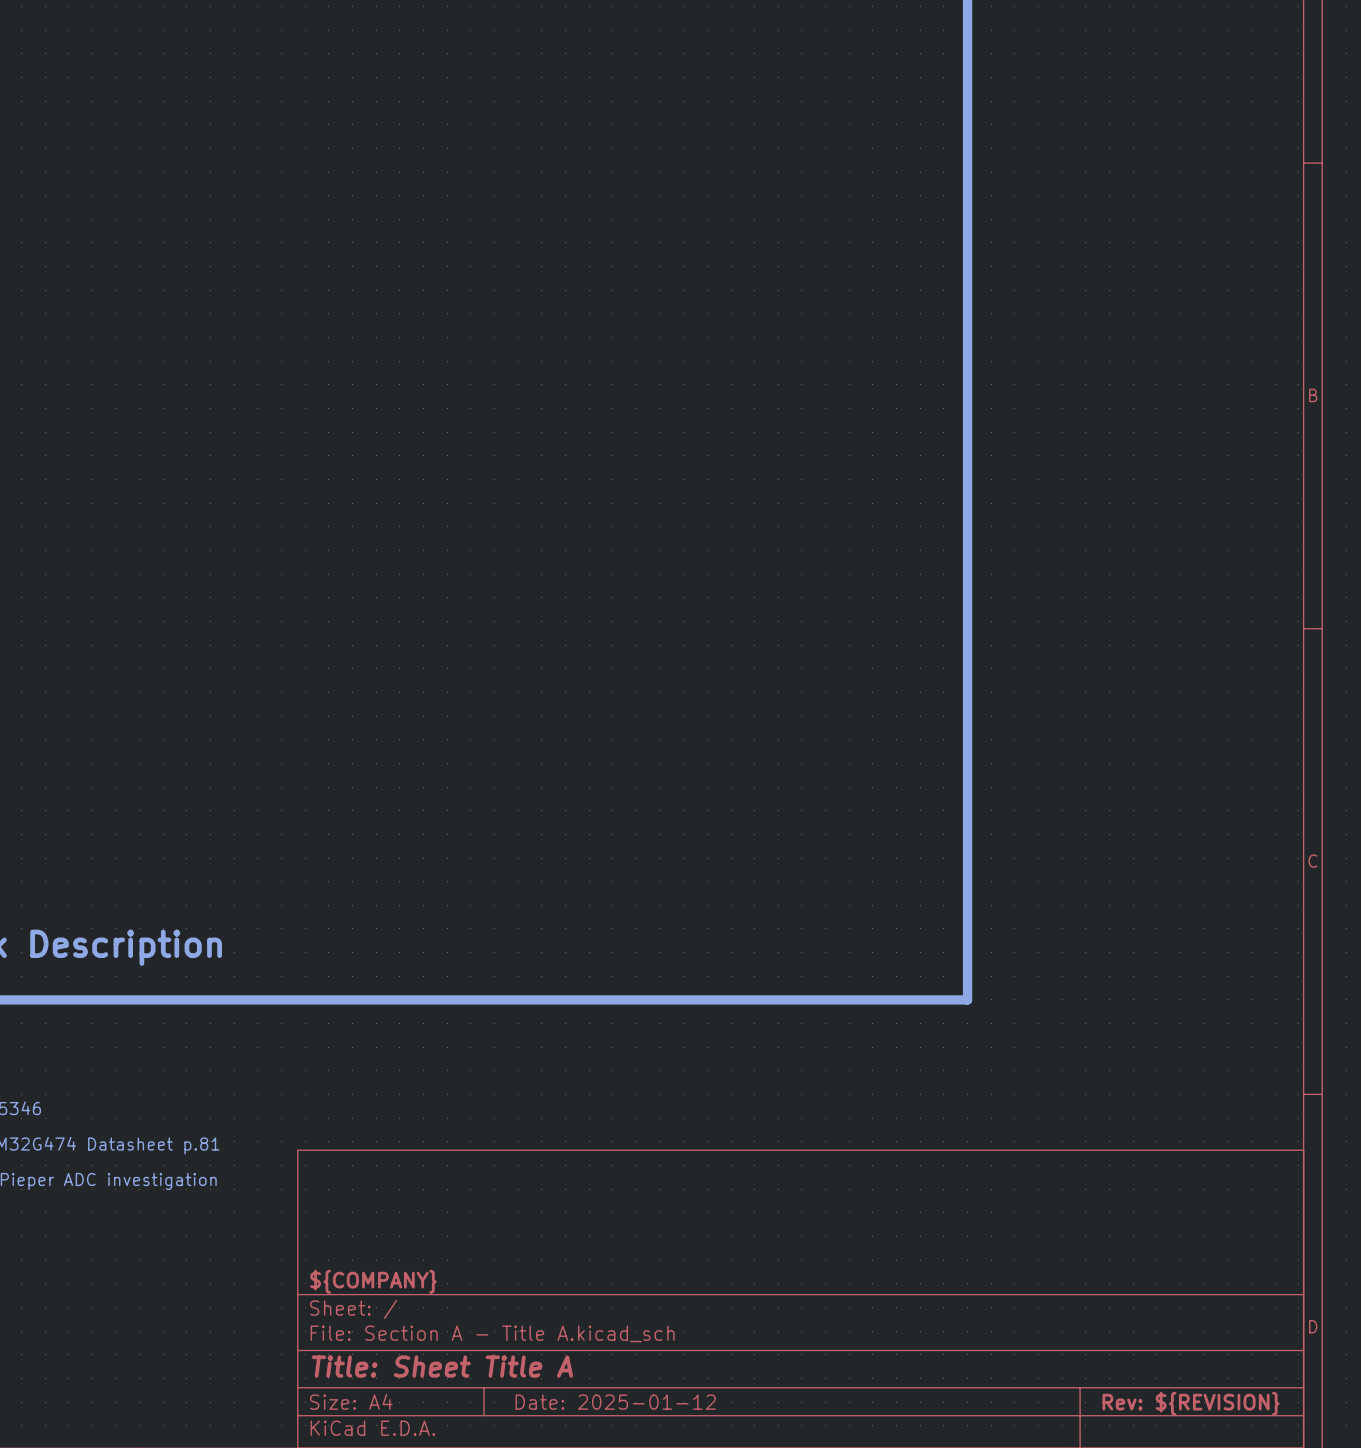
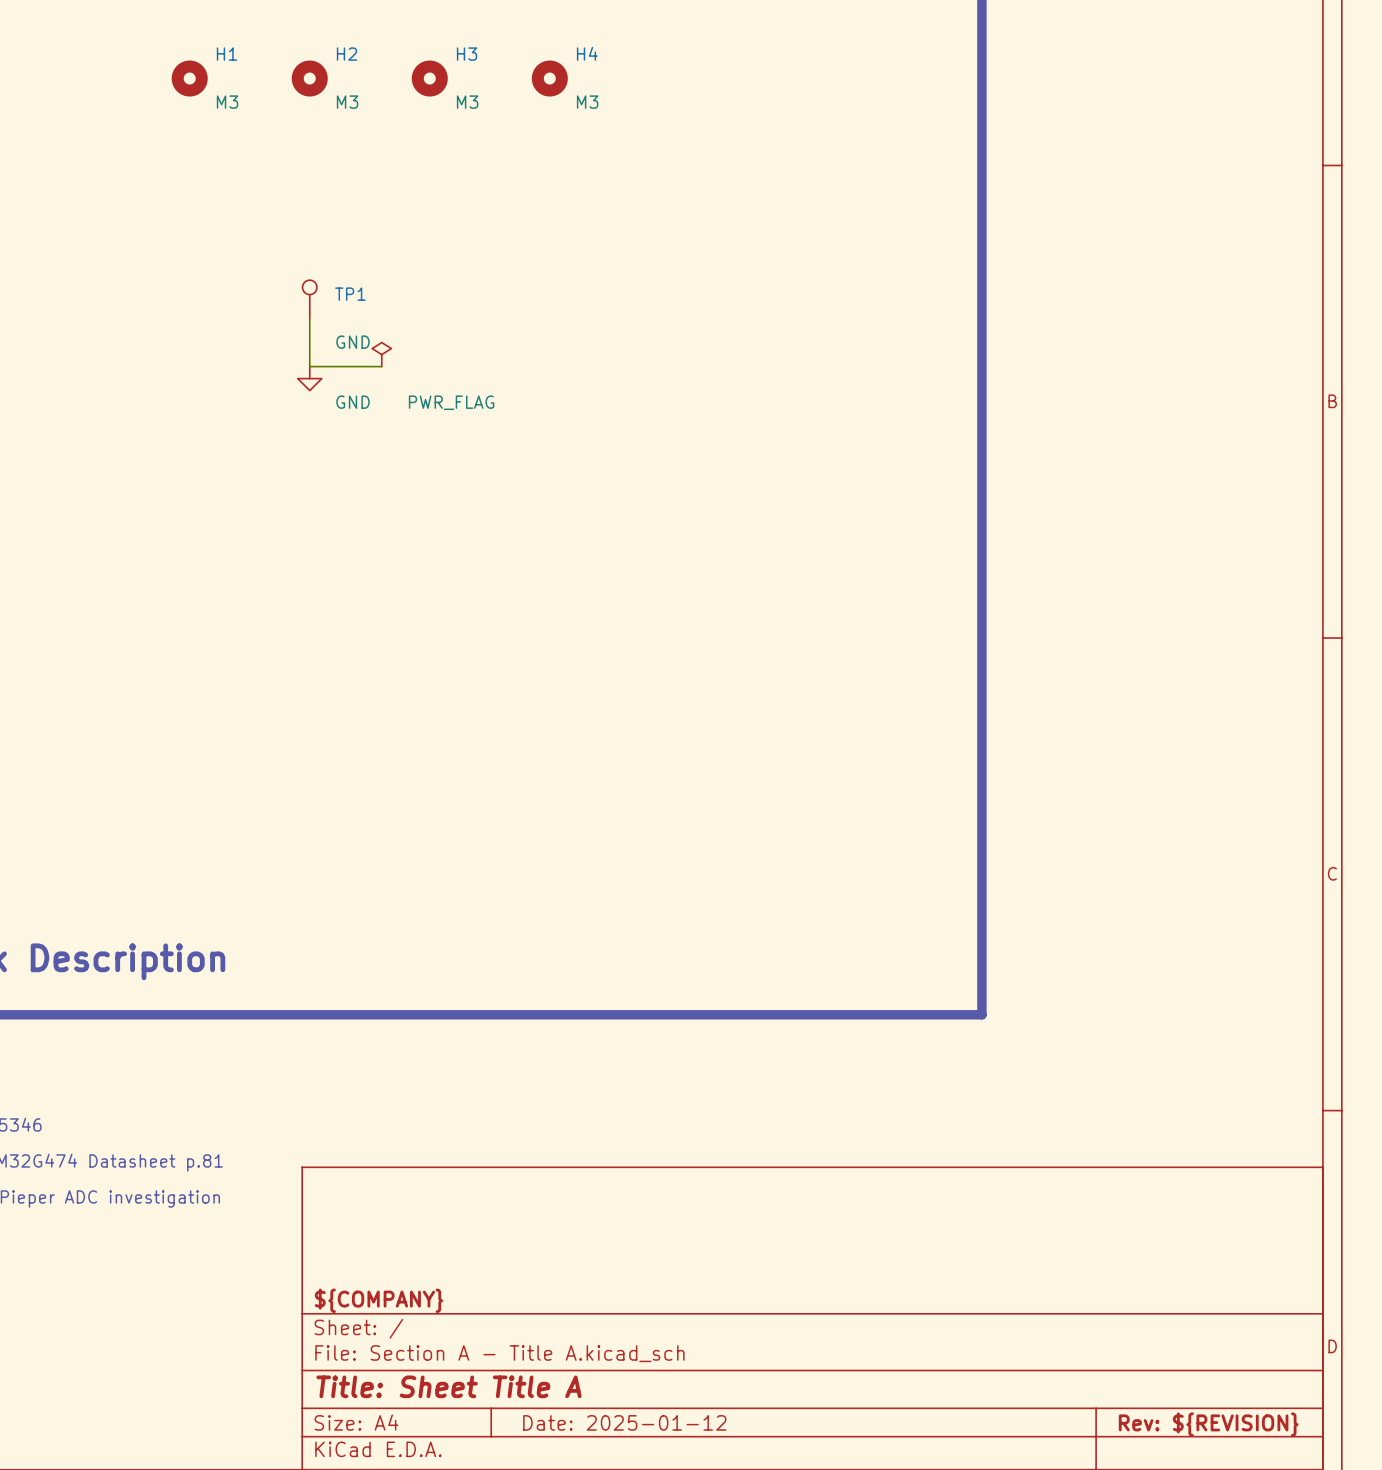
H1: none -> M3 (189, 78)
H2: none -> M3 (309, 78)
H3: none -> M3 (429, 78)
H4: none -> M3 (549, 78)
TP1: none -> GND (309, 299)
wire: none -> (309, 318) (309, 366) (381, 366)
power symbol: none -> PWR_FLAG (381, 354)
power symbol: none -> GND (309, 378)

